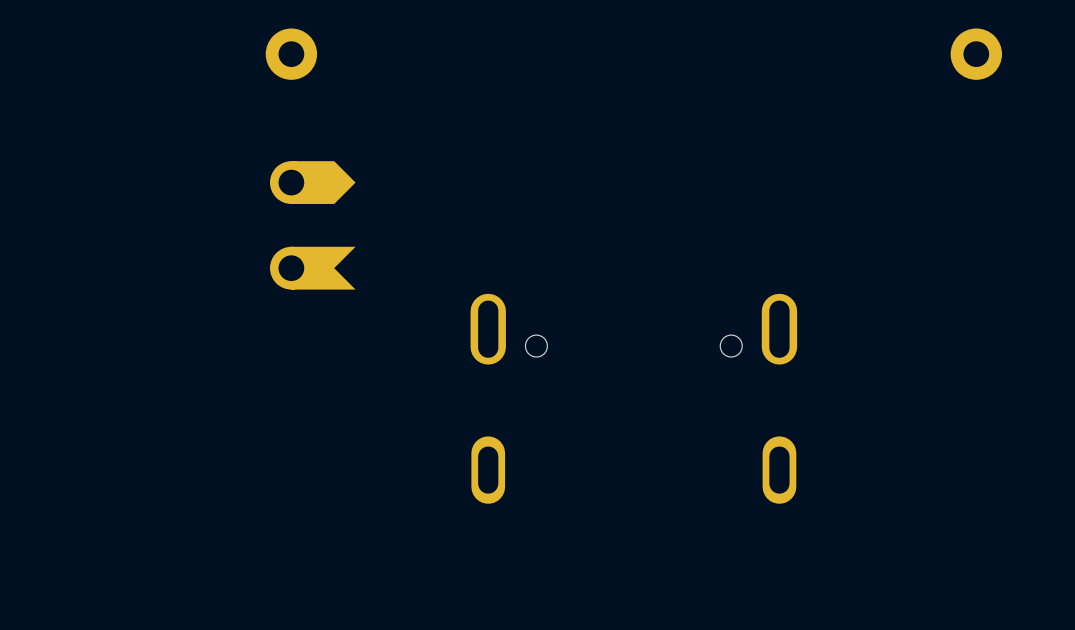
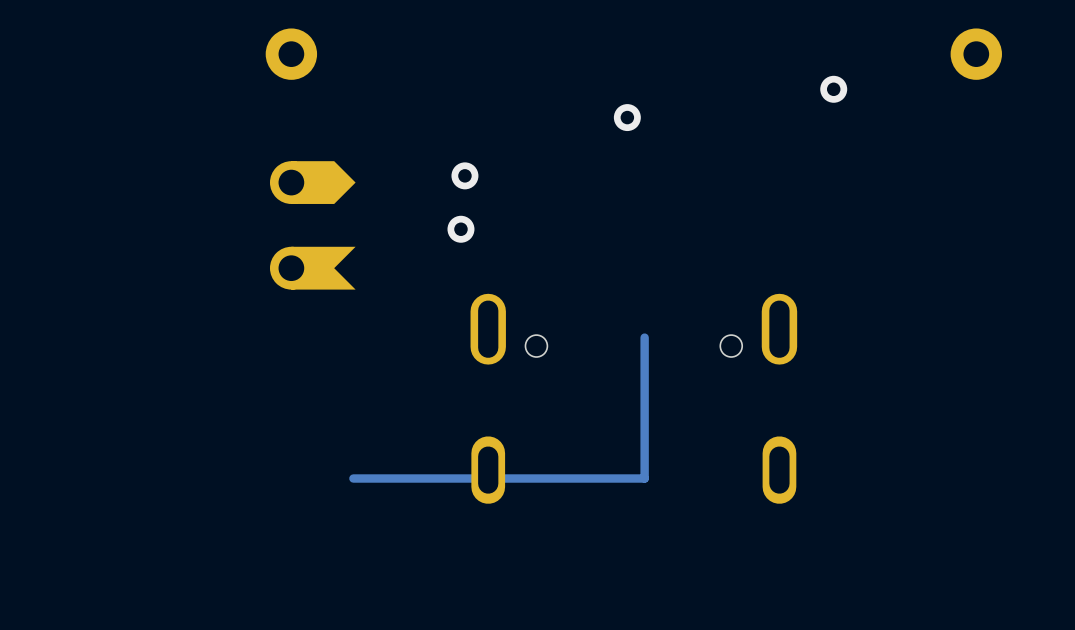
via: none -> (833, 89)
via: none -> (627, 117)
via: none -> (464, 175)
via: none -> (460, 229)
track: none -> (644, 337) (644, 478) (353, 478)

